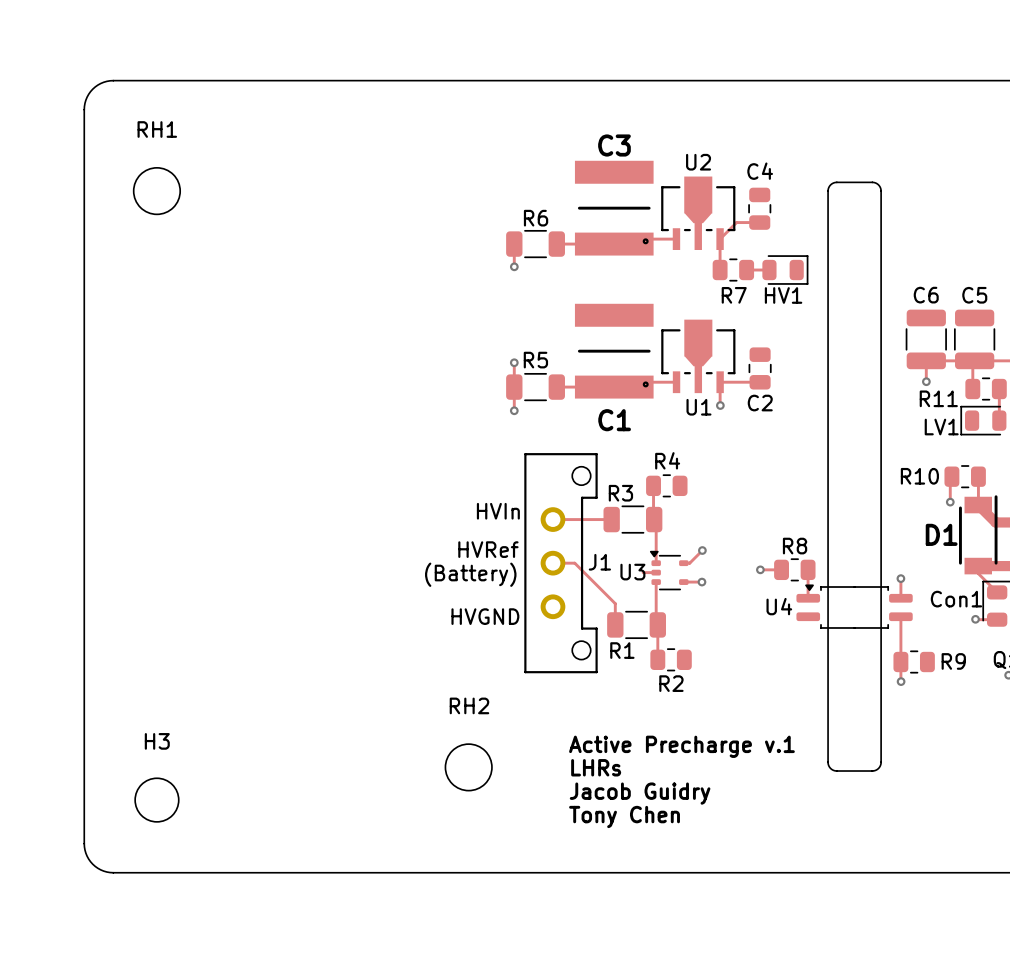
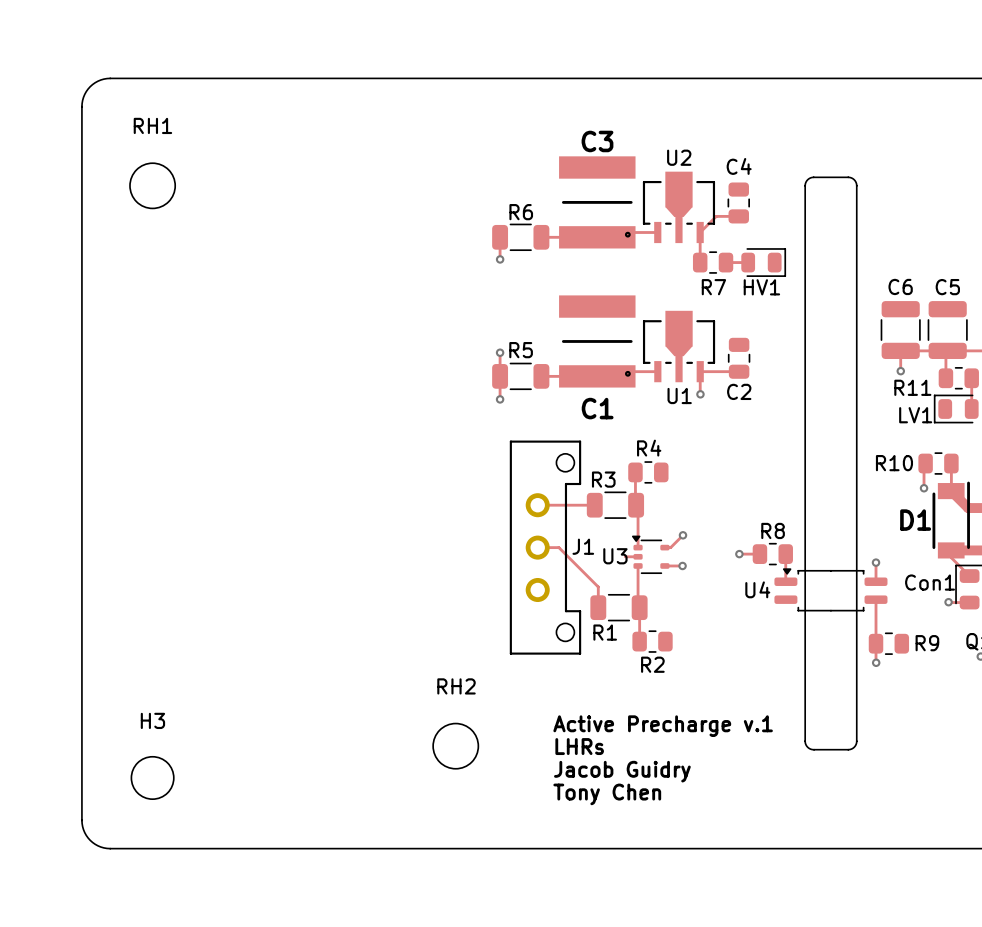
text: HVIn (498, 511) -> none
text: HVRef (488, 549) -> none
text: (Battery) (470, 574) -> none
text: HVGND (485, 616) -> none

